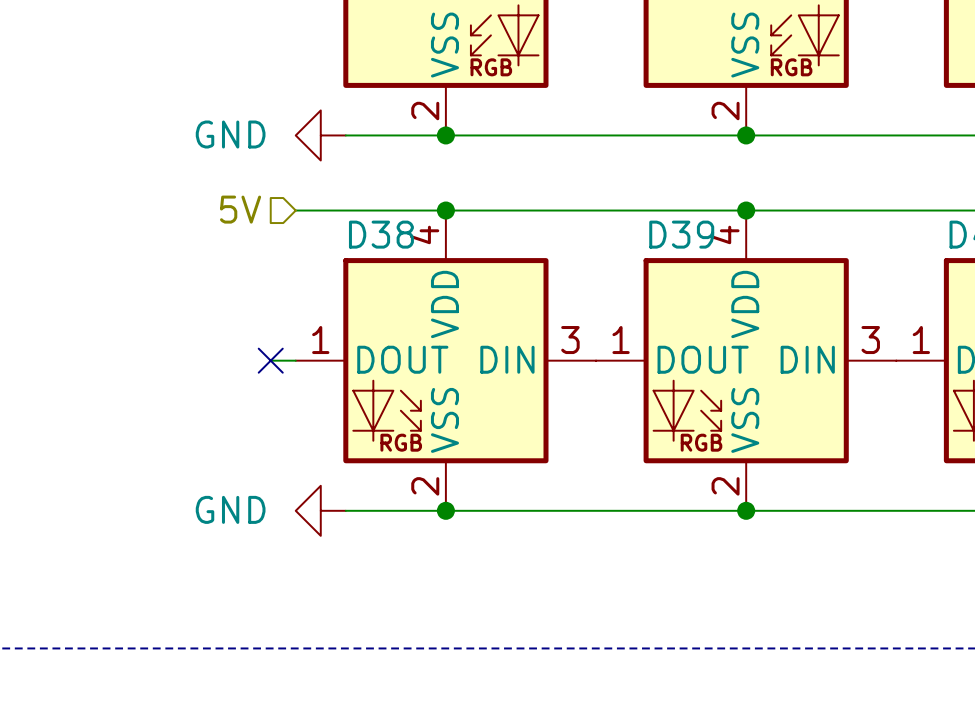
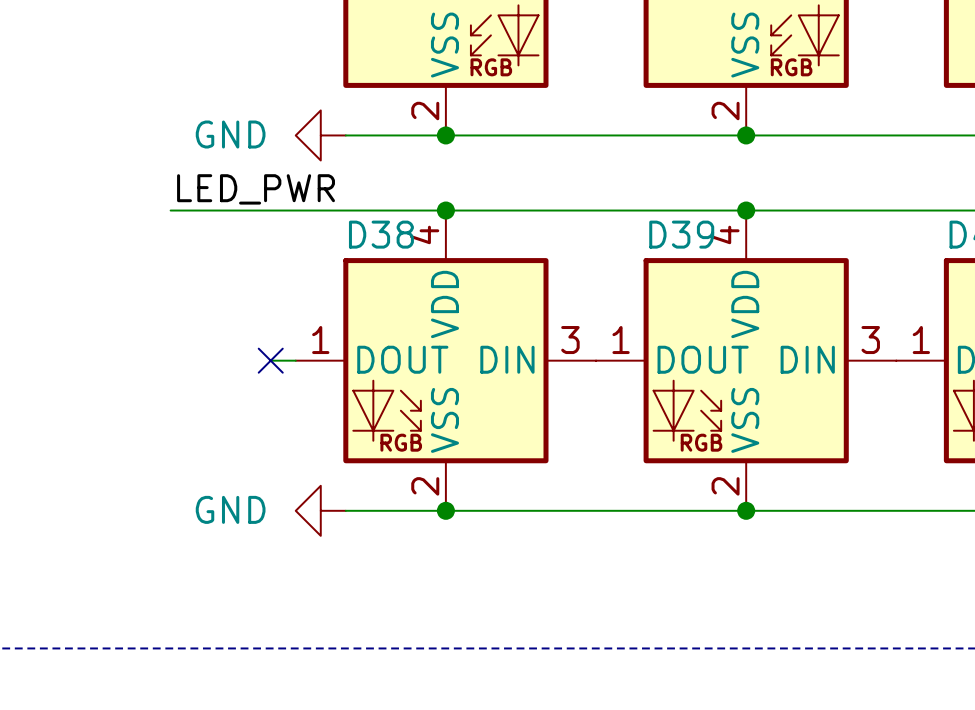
label: none -> LED_PWR (256, 189)
hierarchical label: 5V (240, 209) -> none
wire: none -> (170, 210) (295, 210)

